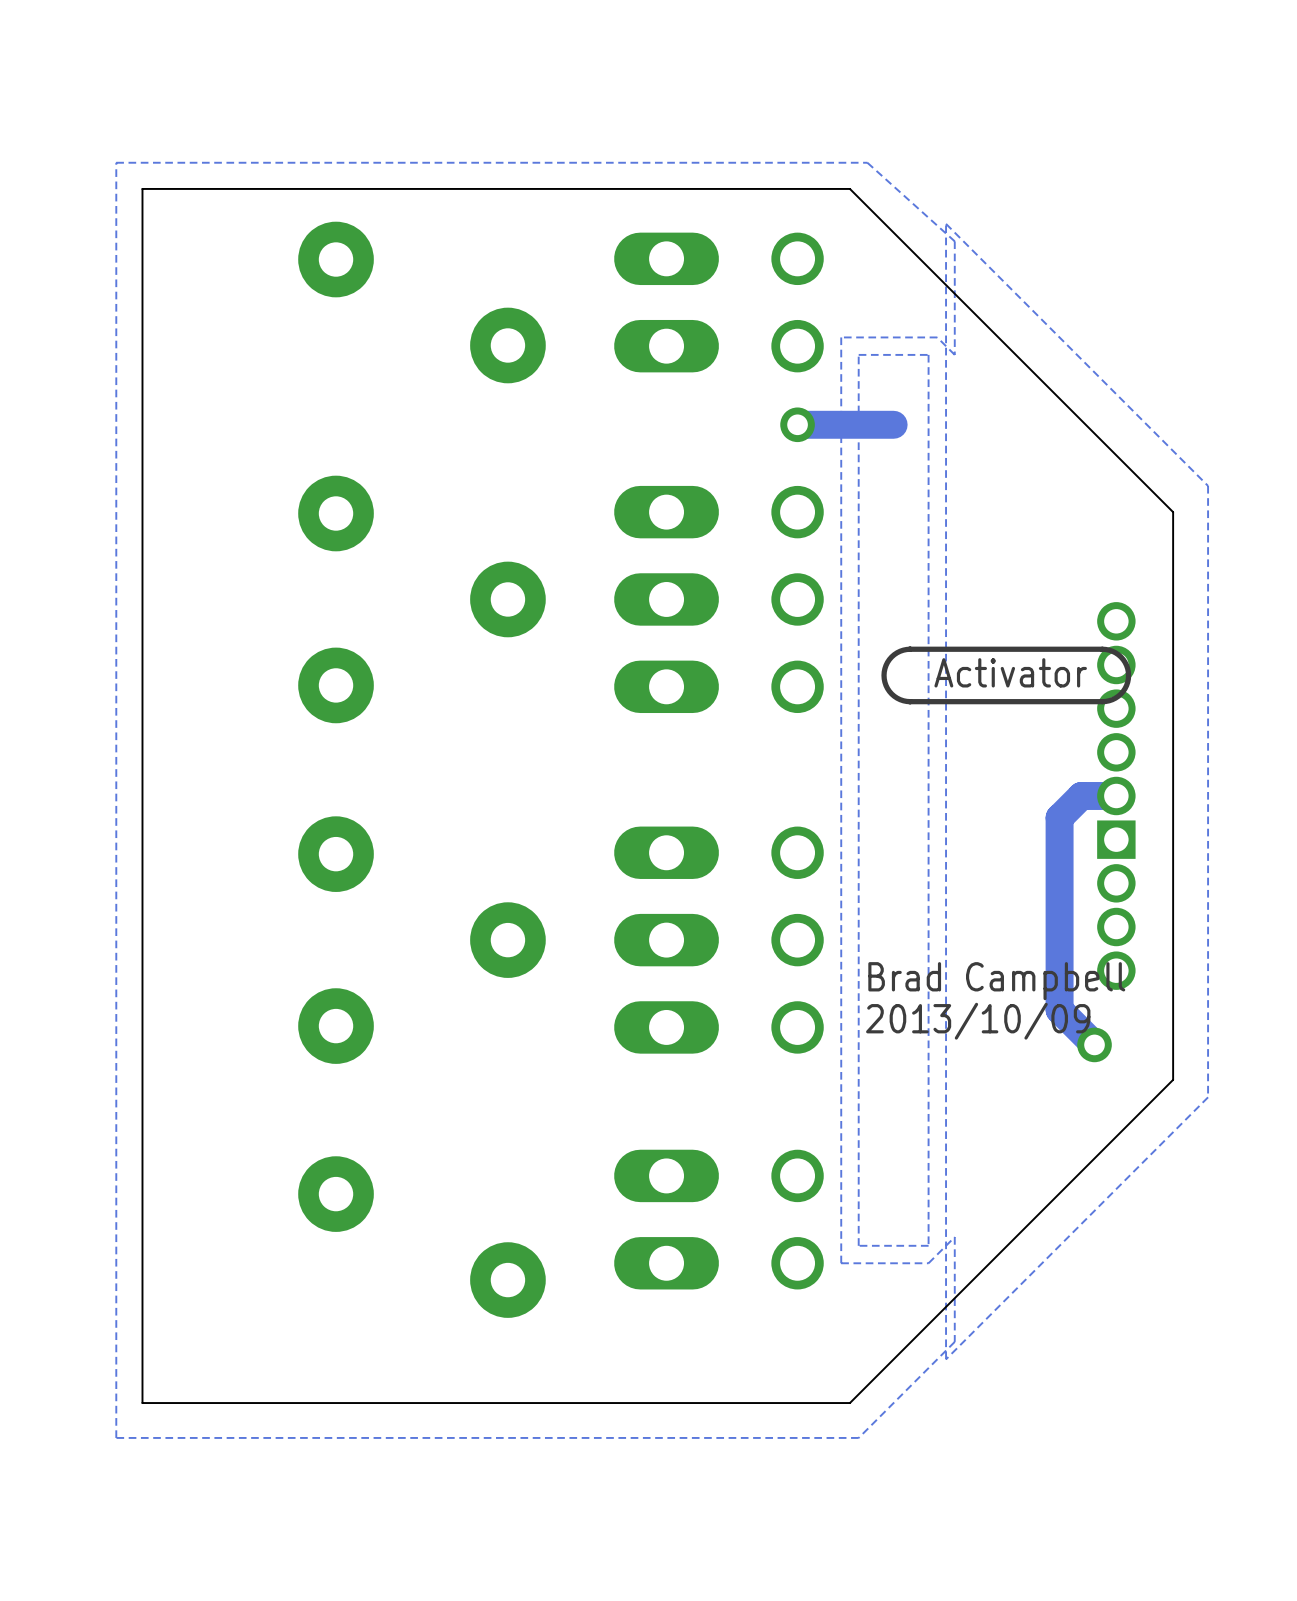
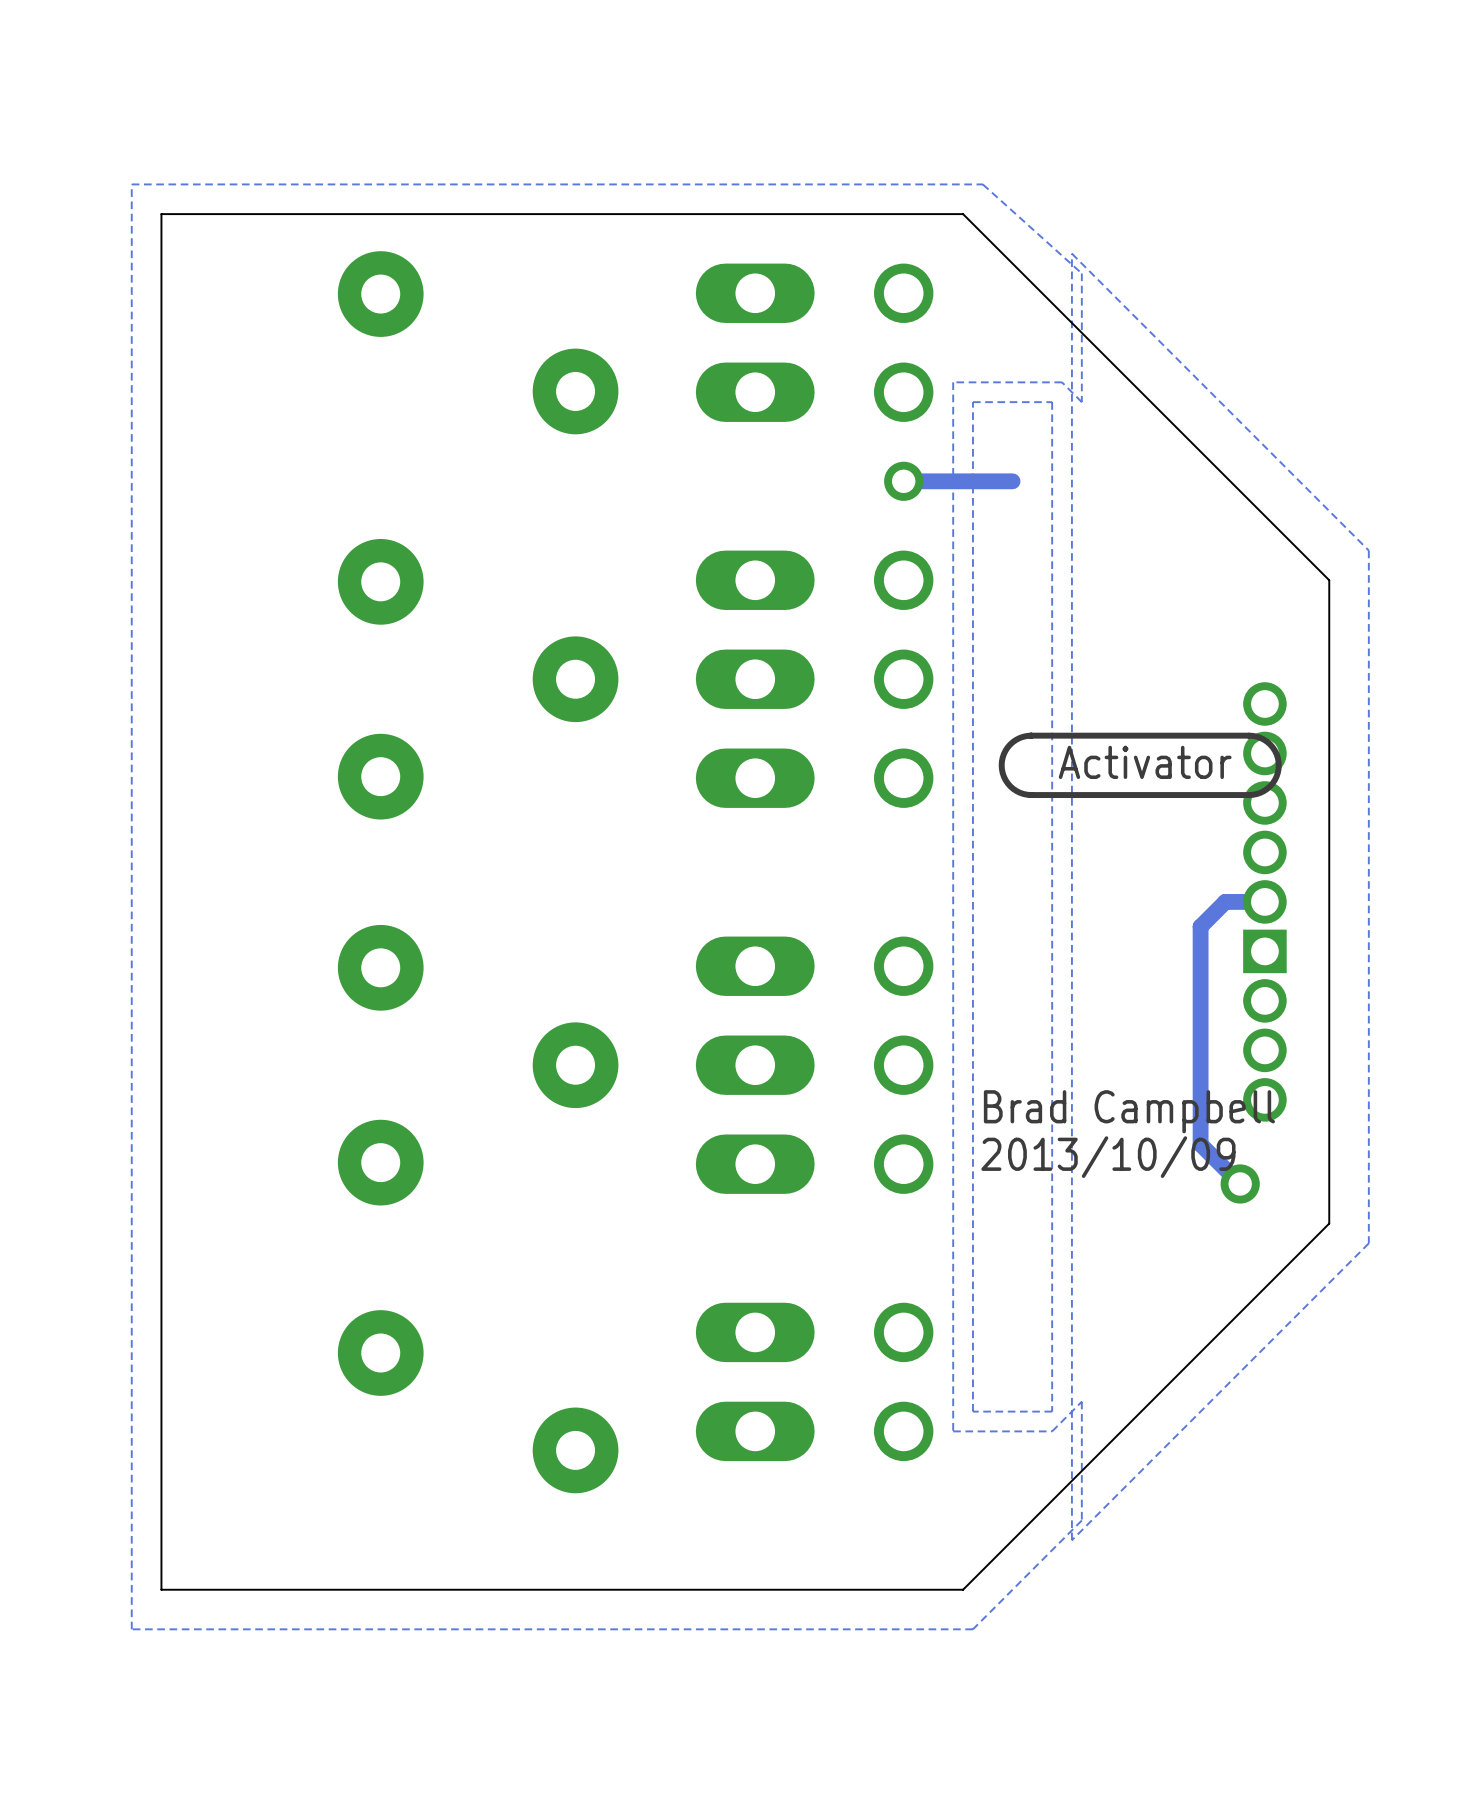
track width: thick (893, 424) (797, 424) -> thin (1012, 481) (903, 481)
track width: thick (1116, 795) (1081, 795) (1059, 817) (1059, 1009) (1094, 1044) -> thin (1264, 901) (1225, 901) (1200, 926) (1200, 1144) (1240, 1183)

